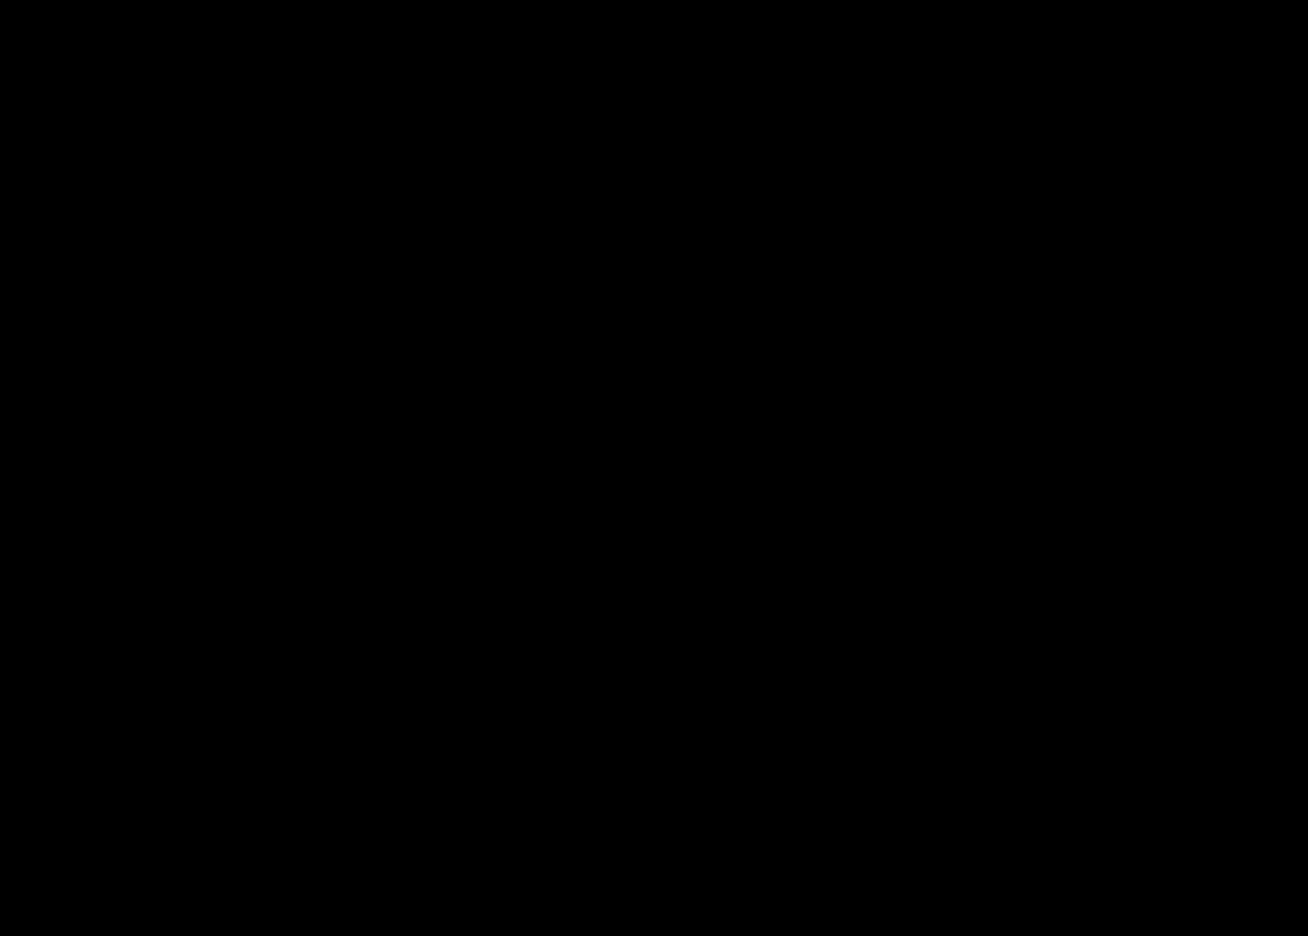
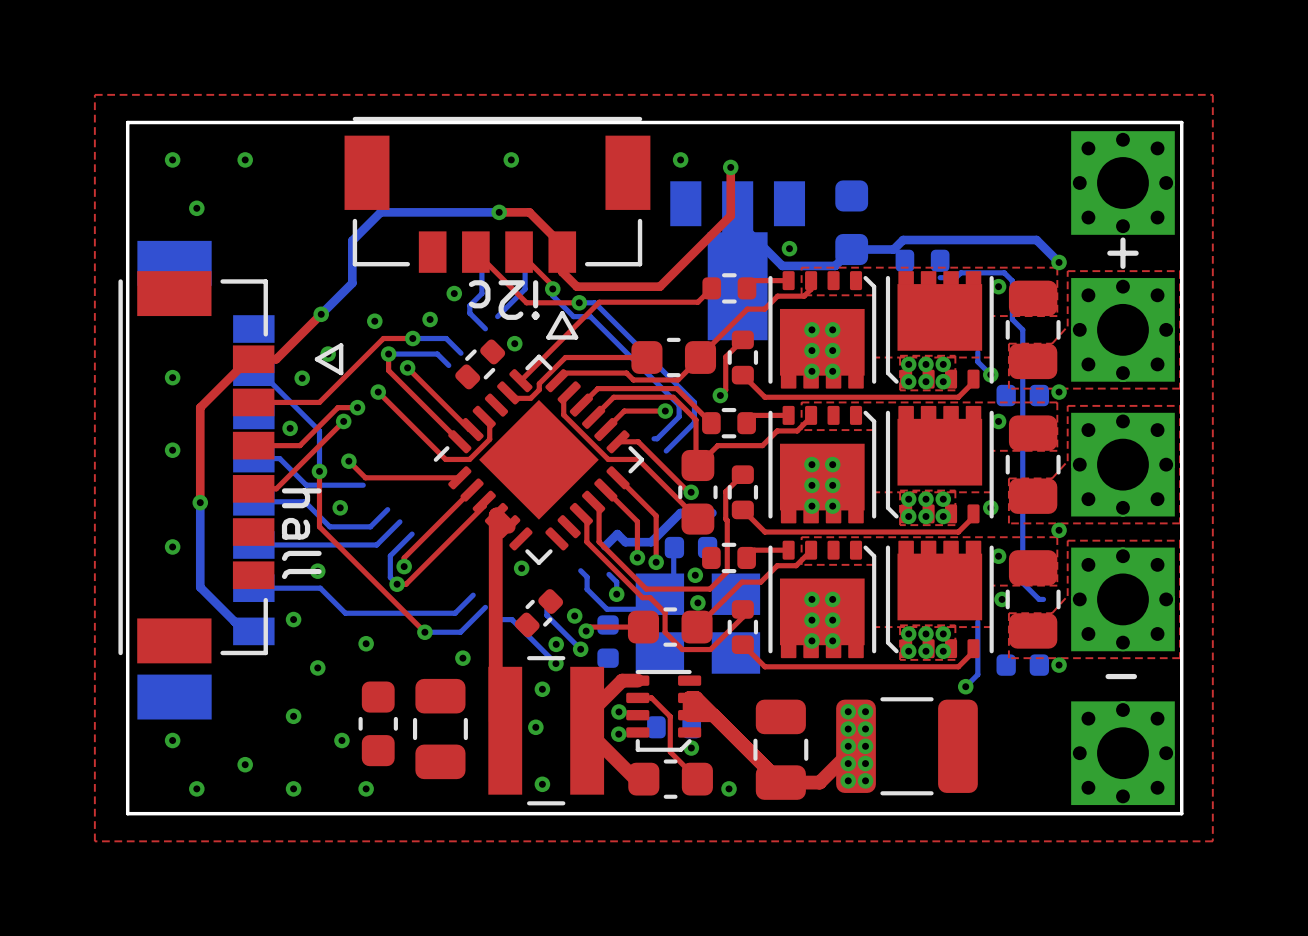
top zone outline: none -> (94, 94) (94, 841) (1212, 841) (1212, 94) (94, 94)
board edge: none -> (127, 122) (1181, 122) (1181, 813) (127, 813) (127, 122)
via: none -> (172, 159)
via: none -> (245, 159)
via: none -> (511, 159)
via: none -> (680, 159)
top track: none -> (730, 167) (730, 215) (659, 286) (576, 286) (562, 272) (562, 245) (529, 212) (499, 212)
via: none -> (730, 167)
part: none -> (1122, 182)
via: none -> (196, 208)
bottom track: none -> (499, 212) (380, 212) (352, 240) (352, 283) (321, 314)
via: none -> (499, 212)
bottom track: none -> (737, 221) (782, 265) (835, 265) (851, 249) (893, 249) (903, 240) (1036, 240) (1059, 262)
part: none -> (851, 222)
part: none -> (497, 228)
via: none -> (789, 248)
bottom track: none -> (481, 250) (481, 293) (469, 305) (469, 313) (485, 328)
bottom track: none -> (525, 250) (525, 289) (497, 316)
text: none -> + (1122, 253)
top track: none -> (475, 252) (526, 302) (579, 302)
top track: none -> (519, 252) (552, 285) (552, 289)
part: none -> (737, 260)
part: none -> (922, 260)
via: none -> (1059, 262)
top zone outline: none -> (801, 267) (801, 295) (874, 295) (874, 357) (991, 357) (991, 316) (1057, 316) (1057, 267) (801, 267)
top zone outline: none -> (1067, 271) (1067, 326) (1052, 343) (1008, 343) (1008, 388) (1180, 388) (1180, 271) (1067, 271)
bottom track: none -> (940, 277) (956, 277) (960, 272) (1004, 272) (1012, 280) (1012, 319) (1022, 329) (1022, 583) (1039, 599) (1043, 599)
top track: none -> (788, 280) (754, 280) (746, 288)
top track: none -> (811, 280) (811, 289) (804, 296) (777, 296) (764, 309) (747, 309) (678, 379) (633, 379) (626, 373) (564, 373) (556, 380)
via: none -> (998, 286)
top track: none -> (711, 288) (697, 302) (599, 302) (520, 380)
part: none -> (729, 288)
bottom track: none -> (552, 289) (552, 295) (573, 316) (590, 316) (679, 405) (679, 416) (657, 438) (654, 438)
via: none -> (552, 289)
via: none -> (454, 293)
text: none -> i2c (504, 300)
bottom track: none -> (579, 302) (594, 302) (694, 402) (694, 422) (666, 450)
via: none -> (579, 302)
top track: none -> (321, 314) (276, 359) (248, 359) (200, 407) (200, 502)
via: none -> (321, 314)
via: none -> (430, 319)
via: none -> (374, 321)
via: none -> (811, 329)
part: none -> (822, 329)
via: none -> (832, 329)
part: none -> (939, 329)
part: none -> (1033, 329)
part: none -> (1122, 329)
top track: none -> (412, 338) (383, 338) (319, 402) (253, 402)
bottom track: none -> (412, 338) (446, 338) (460, 353)
via: none -> (412, 338)
top track: none -> (742, 339) (725, 356) (725, 390) (720, 395)
via: none -> (514, 343)
via: none -> (811, 350)
via: none -> (832, 350)
bottom track: none -> (977, 352) (977, 361) (990, 374)
via: none -> (328, 354)
top track: none -> (388, 354) (388, 370) (459, 441)
bottom track: none -> (388, 354) (437, 354) (448, 365)
via: none -> (388, 354)
top zone outline: none -> (900, 355) (900, 390) (955, 390) (955, 355) (900, 355)
top track: none -> (646, 357) (565, 357) (539, 383) (539, 389) (530, 398) (514, 398) (508, 392)
part: none -> (673, 357)
part: none -> (742, 357)
part: none -> (480, 364)
via: none -> (908, 364)
via: none -> (925, 364)
via: none -> (943, 364)
top track: none -> (407, 367) (469, 429) (472, 429)
via: none -> (407, 367)
via: none -> (811, 371)
via: none -> (832, 371)
bottom track: none -> (253, 372) (260, 372) (319, 430) (319, 471)
via: none -> (990, 374)
top track: none -> (742, 375) (764, 397) (958, 397) (973, 382) (973, 379)
via: none -> (172, 377)
via: none -> (302, 378)
via: none -> (908, 381)
via: none -> (925, 381)
via: none -> (943, 381)
top track: none -> (378, 392) (445, 459) (469, 459) (489, 439) (489, 422) (484, 417)
via: none -> (378, 392)
top track: none -> (569, 392) (563, 398) (563, 414) (608, 459) (638, 459) (697, 519)
via: none -> (1059, 392)
via: none -> (720, 395)
part: none -> (1022, 395)
top zone outline: none -> (801, 402) (801, 430) (874, 430) (874, 492) (991, 492) (991, 450) (1057, 450) (1057, 402) (801, 402)
top track: none -> (581, 405) (597, 388) (676, 388) (711, 423)
top zone outline: none -> (1067, 405) (1067, 461) (1052, 478) (1008, 478) (1008, 523) (1180, 523) (1180, 405) (1067, 405)
top track: none -> (357, 407) (337, 407) (299, 445) (253, 445)
via: none -> (357, 407)
top track: none -> (665, 411) (624, 411) (605, 429)
via: none -> (665, 411)
top track: none -> (788, 415) (754, 415) (746, 423)
top track: none -> (811, 415) (797, 430) (777, 430) (762, 445) (717, 445) (697, 465) (696, 463) (696, 420) (673, 397) (613, 397) (593, 417)
top track: none -> (343, 421) (276, 488) (253, 488)
via: none -> (343, 421)
via: none -> (998, 421)
part: none -> (729, 423)
via: none -> (290, 428)
top track: none -> (618, 441) (638, 441) (688, 492) (691, 492)
via: none -> (172, 450)
bottom track: none -> (253, 458) (279, 458) (306, 485) (363, 485)
part: none -> (538, 459)
top track: none -> (348, 461) (365, 477) (459, 477)
via: none -> (348, 461)
via: none -> (811, 464)
part: none -> (822, 464)
via: none -> (832, 464)
part: none -> (939, 464)
part: none -> (1033, 464)
part: none -> (1122, 464)
part: none -> (230, 467)
top track: none -> (319, 471) (319, 526) (424, 632)
via: none -> (319, 471)
top track: none -> (742, 474) (725, 491) (727, 571) (710, 589) (646, 589) (599, 541) (599, 507) (593, 502)
top track: none -> (618, 477) (656, 515) (656, 562)
part: none -> (205, 480)
via: none -> (811, 485)
via: none -> (832, 485)
top track: none -> (472, 490) (404, 557) (404, 566)
top track: none -> (605, 490) (637, 521) (637, 557)
top zone outline: none -> (900, 490) (900, 525) (955, 525) (955, 490) (900, 490)
via: none -> (691, 492)
part: none -> (697, 492)
part: none -> (742, 492)
via: none -> (908, 499)
via: none -> (925, 499)
via: none -> (943, 499)
bottom track: none -> (253, 501) (304, 501) (329, 526) (370, 526) (387, 509)
bottom track: none -> (200, 502) (200, 587) (244, 631) (253, 631)
via: none -> (200, 502)
top track: none -> (484, 502) (484, 506) (406, 584) (397, 584)
via: none -> (811, 506)
via: none -> (832, 506)
via: none -> (340, 507)
via: none -> (990, 507)
top track: none -> (742, 509) (764, 532) (958, 532) (973, 516) (973, 513)
bottom track: none -> (712, 513) (680, 513) (651, 542) (625, 542) (617, 534) (605, 546)
top track: none -> (581, 514) (586, 519) (586, 541) (642, 597) (650, 597) (665, 612) (665, 632) (682, 649) (710, 649) (742, 617) (742, 609)
via: none -> (908, 516)
via: none -> (925, 516)
via: none -> (943, 516)
bottom track: none -> (399, 521) (376, 544) (253, 544)
top track: none -> (508, 526) (495, 515) (495, 721)
via: none -> (1059, 530)
text: none -> hall (301, 533)
bottom track: none -> (412, 534) (390, 555) (390, 577) (397, 584)
top zone outline: none -> (801, 537) (801, 564) (874, 564) (874, 627) (991, 627) (991, 585) (1057, 585) (1057, 537) (801, 537)
top zone outline: none -> (1067, 540) (1067, 595) (1052, 613) (1008, 613) (1008, 658) (1180, 658) (1180, 540) (1067, 540)
via: none -> (172, 546)
bottom track: none -> (674, 547) (673, 580) (644, 609) (607, 609) (587, 589) (587, 577) (580, 570)
part: none -> (691, 547)
top track: none -> (788, 550) (754, 550) (746, 557)
top track: none -> (811, 550) (796, 565) (777, 565) (760, 582) (741, 582) (697, 627)
via: none -> (998, 556)
via: none -> (637, 557)
part: none -> (729, 557)
via: none -> (656, 562)
via: none -> (404, 566)
via: none -> (521, 568)
via: none -> (317, 571)
bottom track: none -> (608, 574) (616, 582) (616, 594)
via: none -> (695, 575)
via: none -> (397, 584)
bottom track: none -> (253, 588) (320, 588) (345, 613) (455, 613) (473, 595)
via: none -> (616, 594)
via: none -> (811, 599)
part: none -> (822, 599)
via: none -> (832, 599)
part: none -> (939, 599)
via: none -> (1002, 599)
part: none -> (1033, 599)
part: none -> (1122, 599)
via: none -> (697, 602)
bottom track: none -> (485, 607) (460, 632) (424, 632)
bottom track: none -> (546, 607) (546, 615) (580, 649)
part: none -> (538, 613)
via: none -> (574, 615)
via: none -> (293, 619)
bottom track: none -> (497, 619) (511, 619) (555, 663)
via: none -> (811, 620)
via: none -> (832, 620)
bottom track: none -> (977, 621) (977, 674) (965, 686)
part: none -> (697, 623)
top zone outline: none -> (900, 625) (900, 659) (955, 659) (955, 625) (900, 625)
top track: none -> (643, 627) (590, 627) (586, 631)
part: none -> (670, 627)
part: none -> (742, 627)
via: none -> (586, 631)
via: none -> (424, 632)
via: none -> (908, 633)
via: none -> (925, 633)
via: none -> (943, 633)
via: none -> (811, 640)
via: none -> (832, 640)
part: none -> (608, 641)
via: none -> (366, 643)
via: none -> (556, 644)
top track: none -> (742, 644) (764, 666) (958, 666) (973, 651) (973, 648)
via: none -> (580, 649)
via: none -> (908, 651)
via: none -> (925, 651)
via: none -> (943, 651)
via: none -> (462, 658)
via: none -> (555, 663)
part: none -> (1022, 665)
via: none -> (1059, 665)
via: none -> (317, 667)
text: none -> - (1121, 676)
top track: none -> (637, 680) (622, 680) (587, 715) (587, 730) (635, 779) (643, 779)
via: none -> (965, 686)
via: none -> (542, 689)
top track: none -> (637, 697) (651, 697) (670, 716) (670, 751) (697, 779)
part: none -> (663, 710)
via: none -> (618, 711)
via: none -> (848, 711)
via: none -> (865, 711)
top track: none -> (713, 715) (689, 715) (689, 697) (696, 697) (780, 782) (819, 782) (856, 746)
via: none -> (293, 716)
part: none -> (378, 723)
via: none -> (535, 727)
part: none -> (674, 727)
part: none -> (440, 729)
via: none -> (848, 729)
via: none -> (865, 729)
part: none -> (546, 730)
via: none -> (618, 734)
via: none -> (172, 740)
via: none -> (341, 740)
via: none -> (848, 746)
via: none -> (865, 746)
part: none -> (906, 746)
via: none -> (691, 748)
part: none -> (780, 749)
part: none -> (1122, 753)
via: none -> (848, 763)
via: none -> (865, 763)
via: none -> (245, 764)
part: none -> (670, 779)
via: none -> (848, 780)
via: none -> (865, 780)
via: none -> (542, 784)
via: none -> (196, 788)
via: none -> (293, 788)
via: none -> (366, 788)
via: none -> (729, 788)

